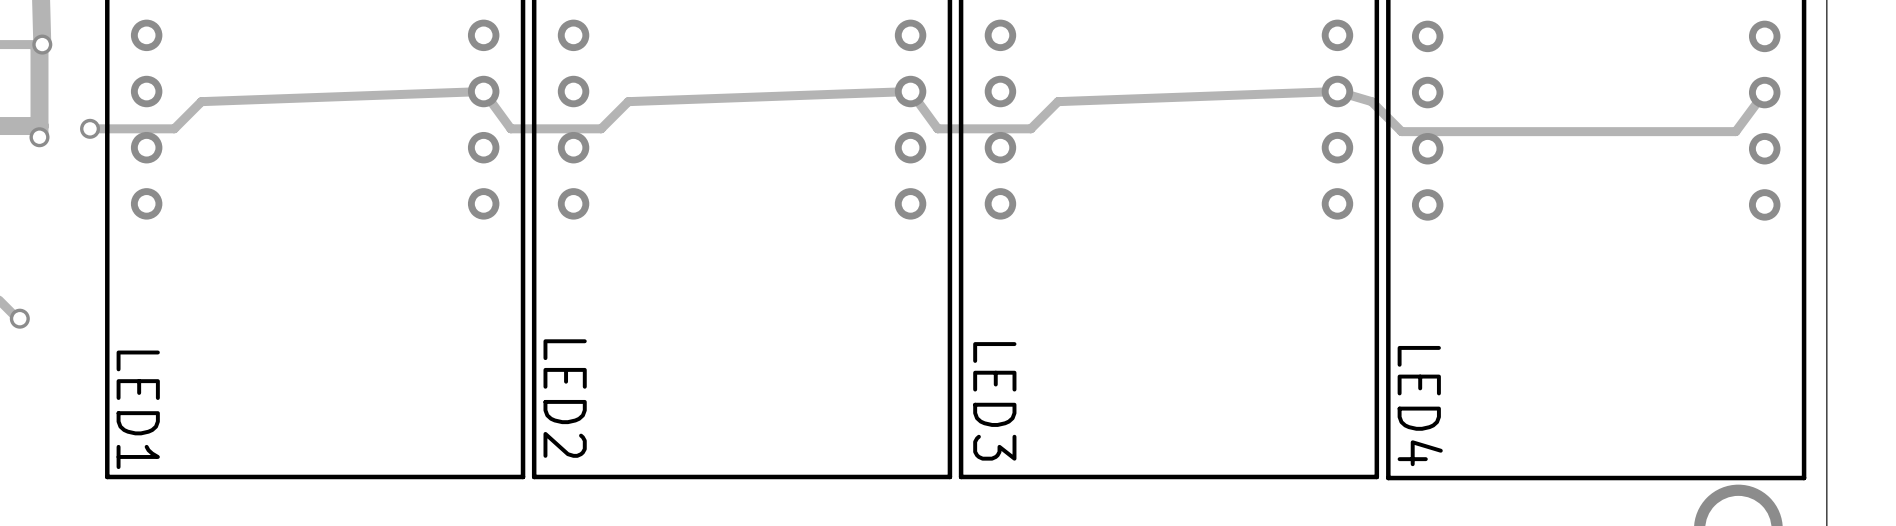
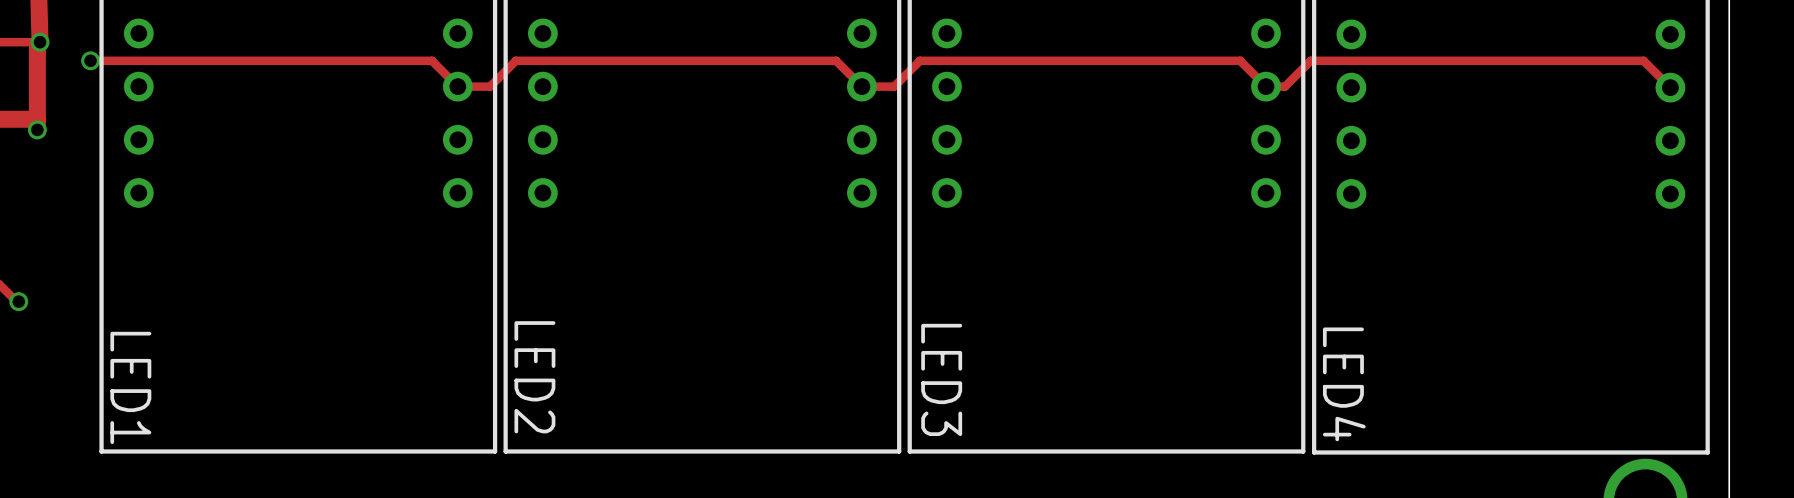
track: (1764, 92) (1735, 131) (1401, 131) (1371, 101) (1337, 91) (1058, 101) (1030, 128) (937, 128) (910, 91) (628, 101) (601, 128) (510, 128) (483, 91) (201, 101) (174, 128) (90, 128) -> (1670, 87) (1643, 60) (1310, 60) (1284, 86) (1266, 86) (1240, 60) (919, 60) (894, 86) (861, 86) (836, 60) (515, 60) (490, 86) (457, 86) (431, 60) (90, 60)
via position: (90, 128) -> (90, 60)

